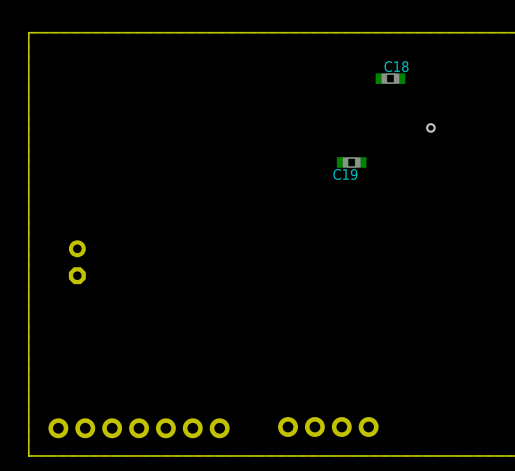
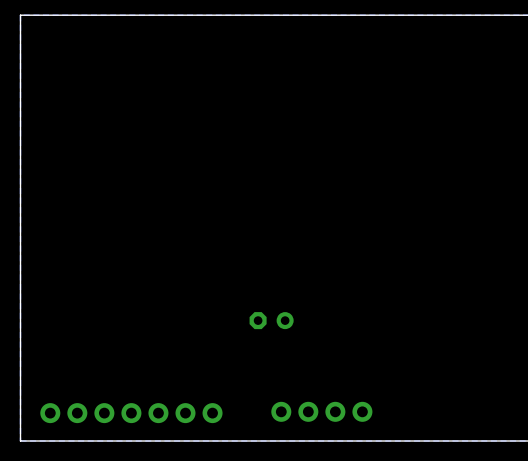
C18: (390, 78) -> none
via: (430, 127) -> none
C19: (351, 162) -> none
part rotation: 0° (77, 262) -> 90° clockwise (271, 320)
part position: (77, 262) -> (271, 320)

